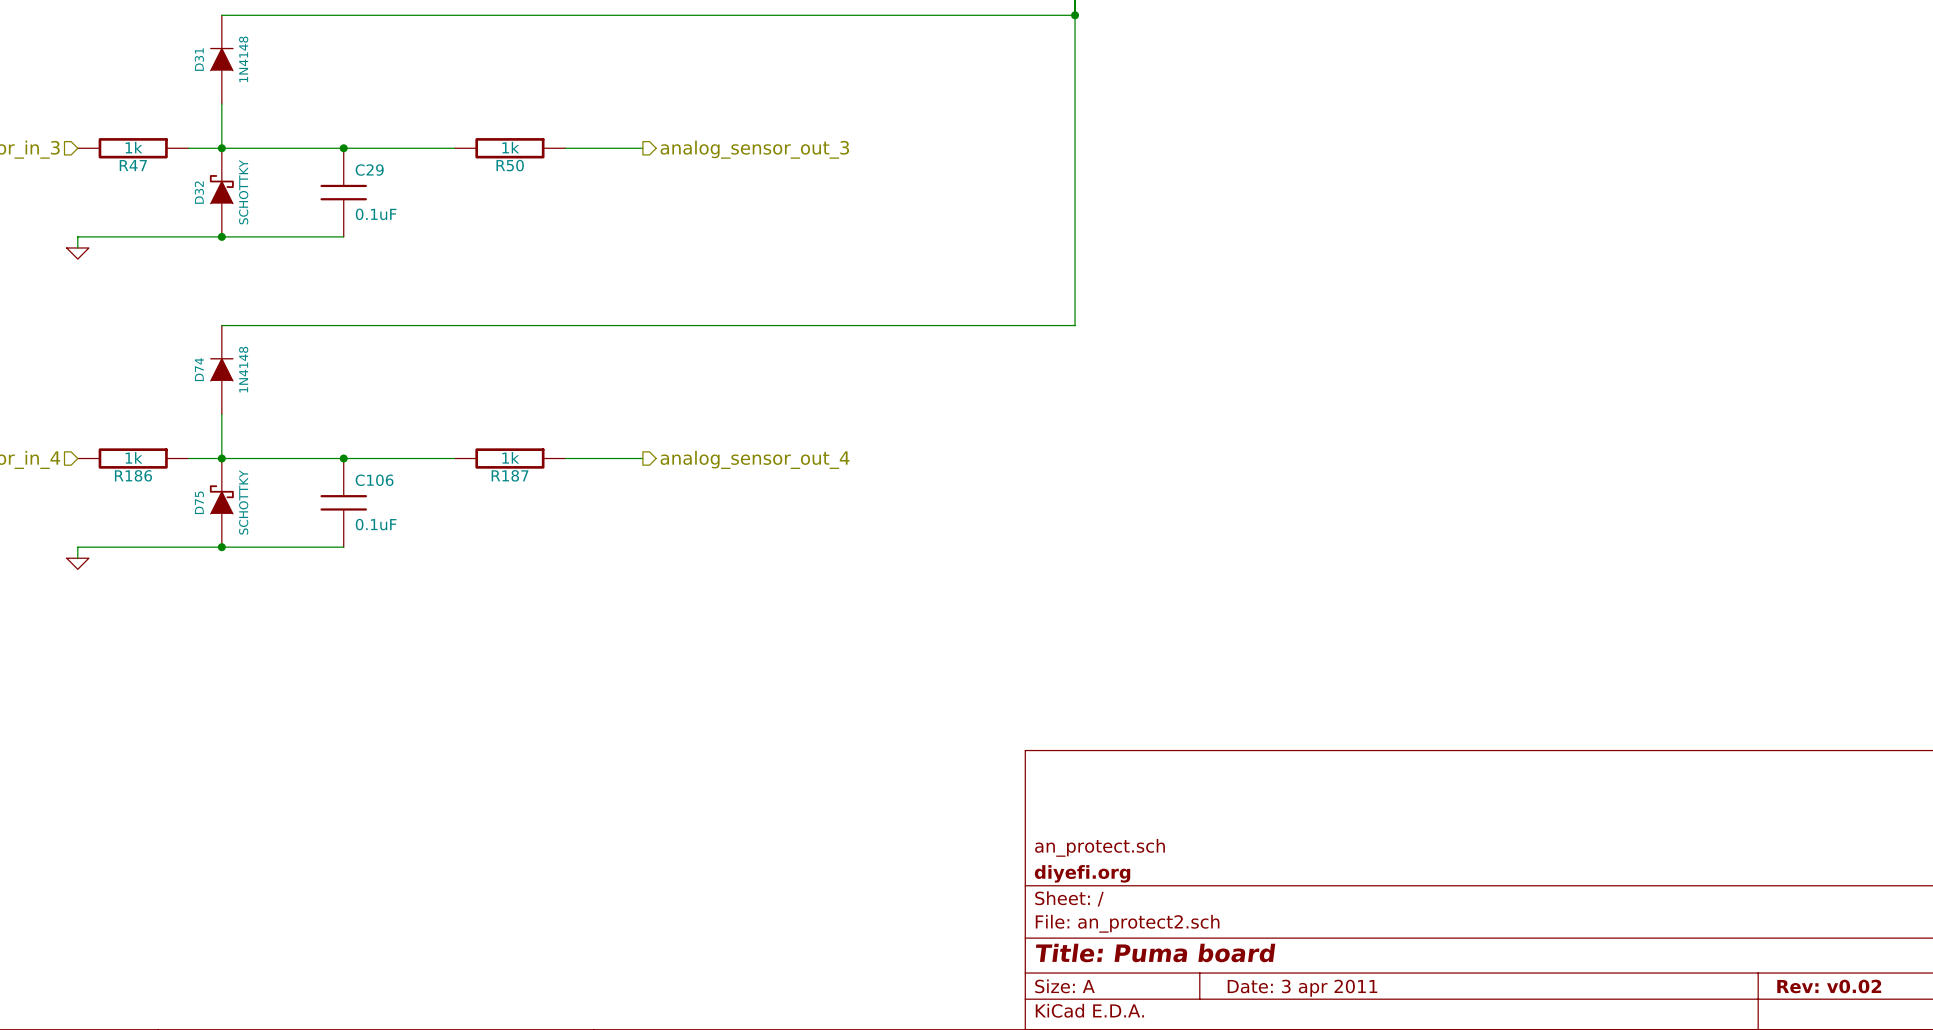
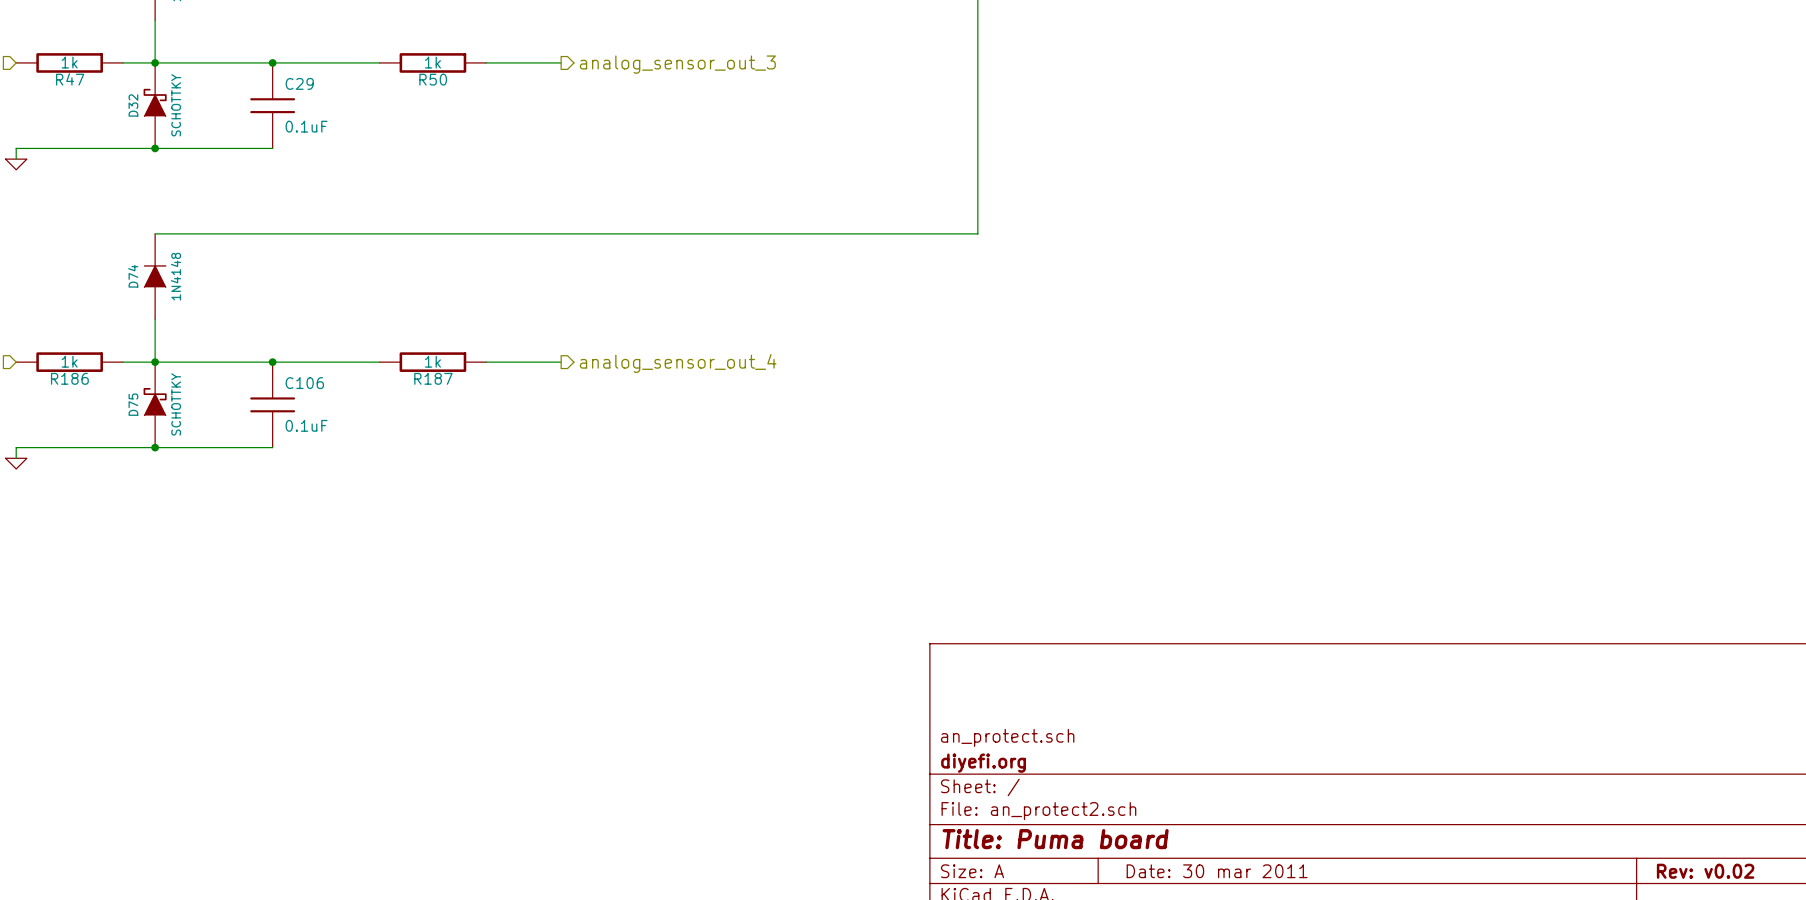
title block: Date: 3 apr 2011 (1302, 988) -> Date: 30 mar 2011 (1217, 871)

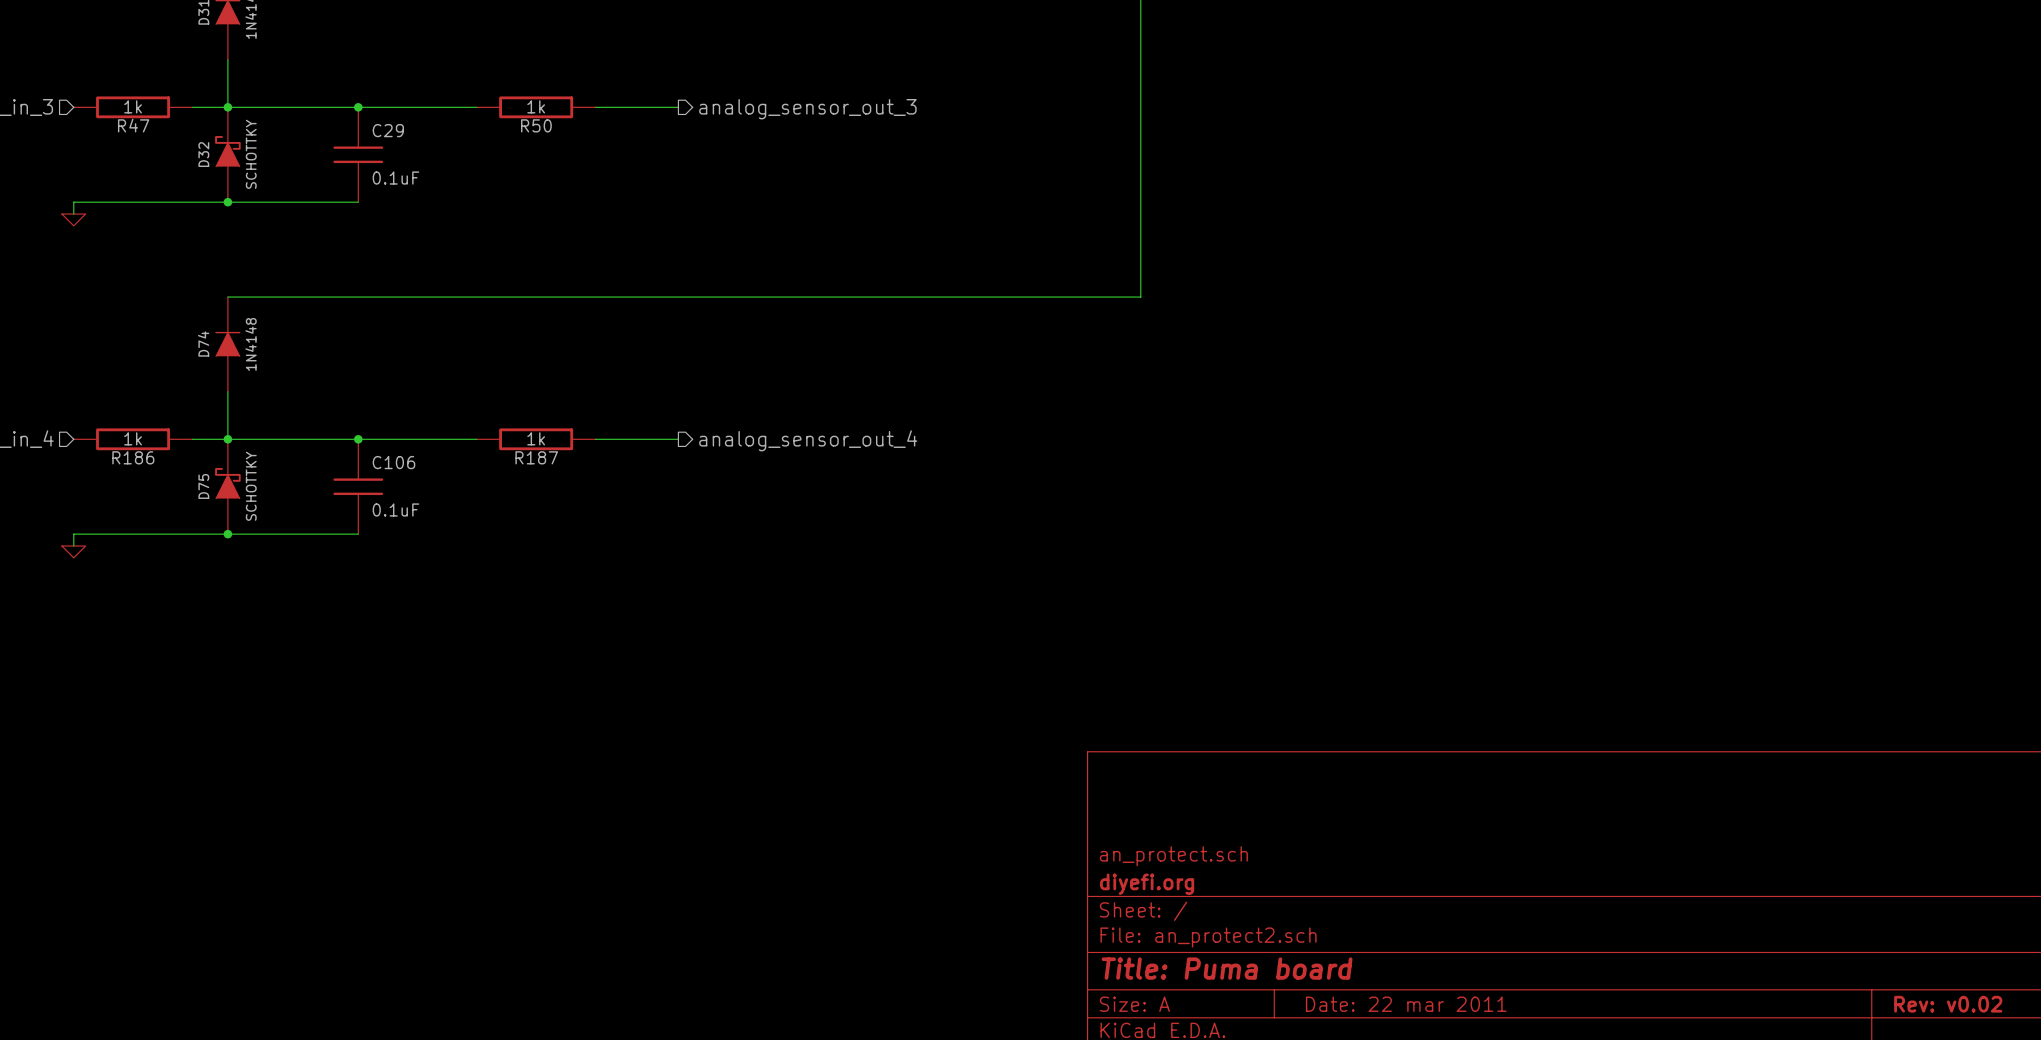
title block: Date: 30 mar 2011 (1217, 871) -> Date: 22 mar 2011 (1406, 1004)

